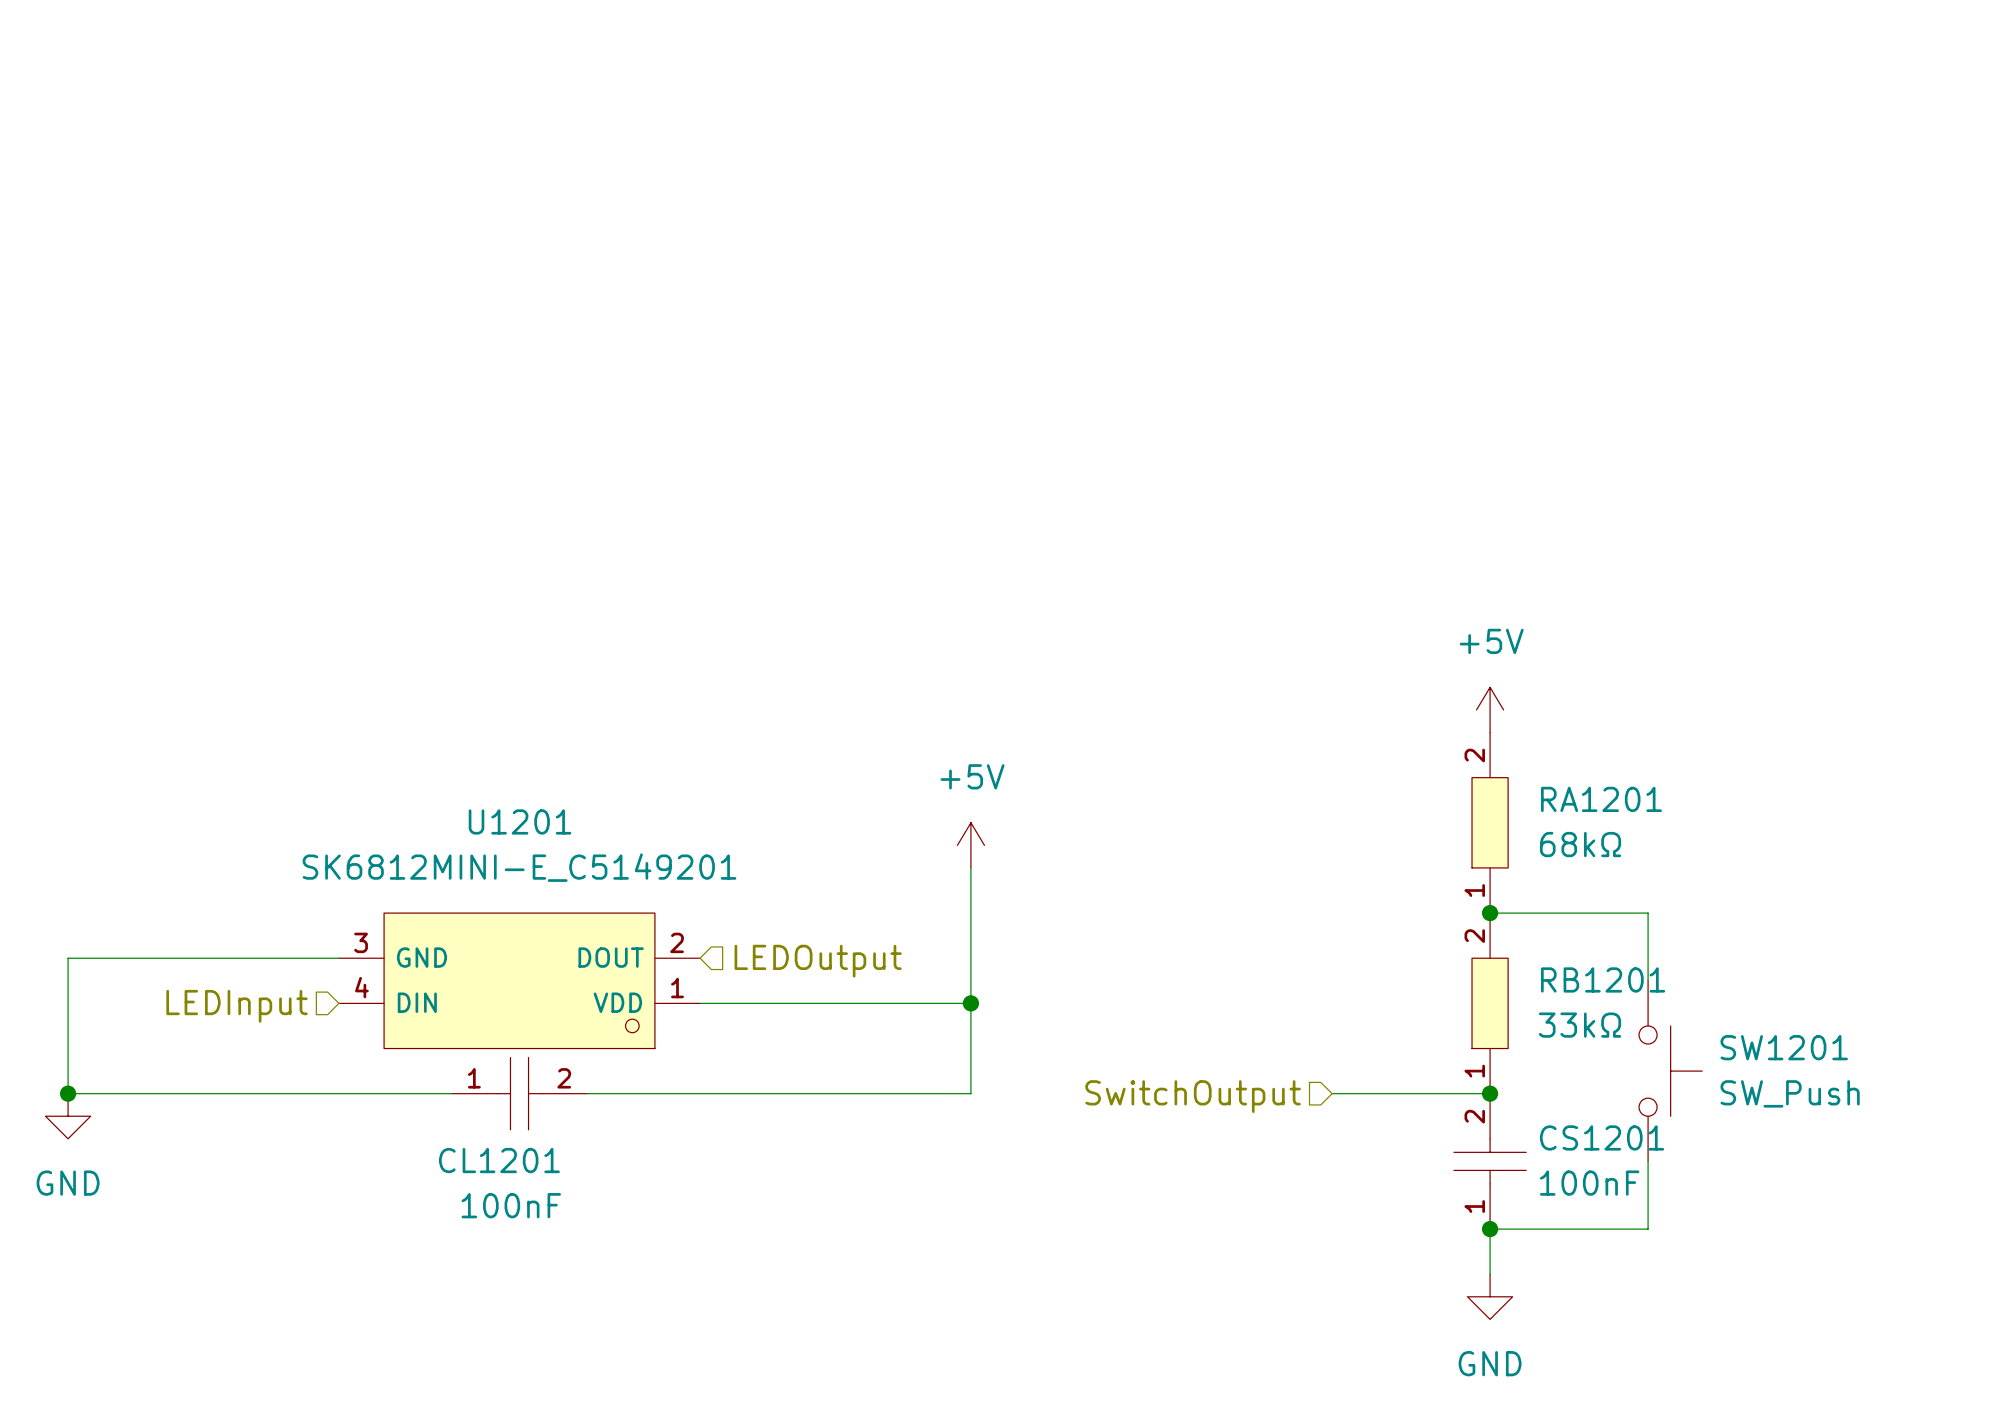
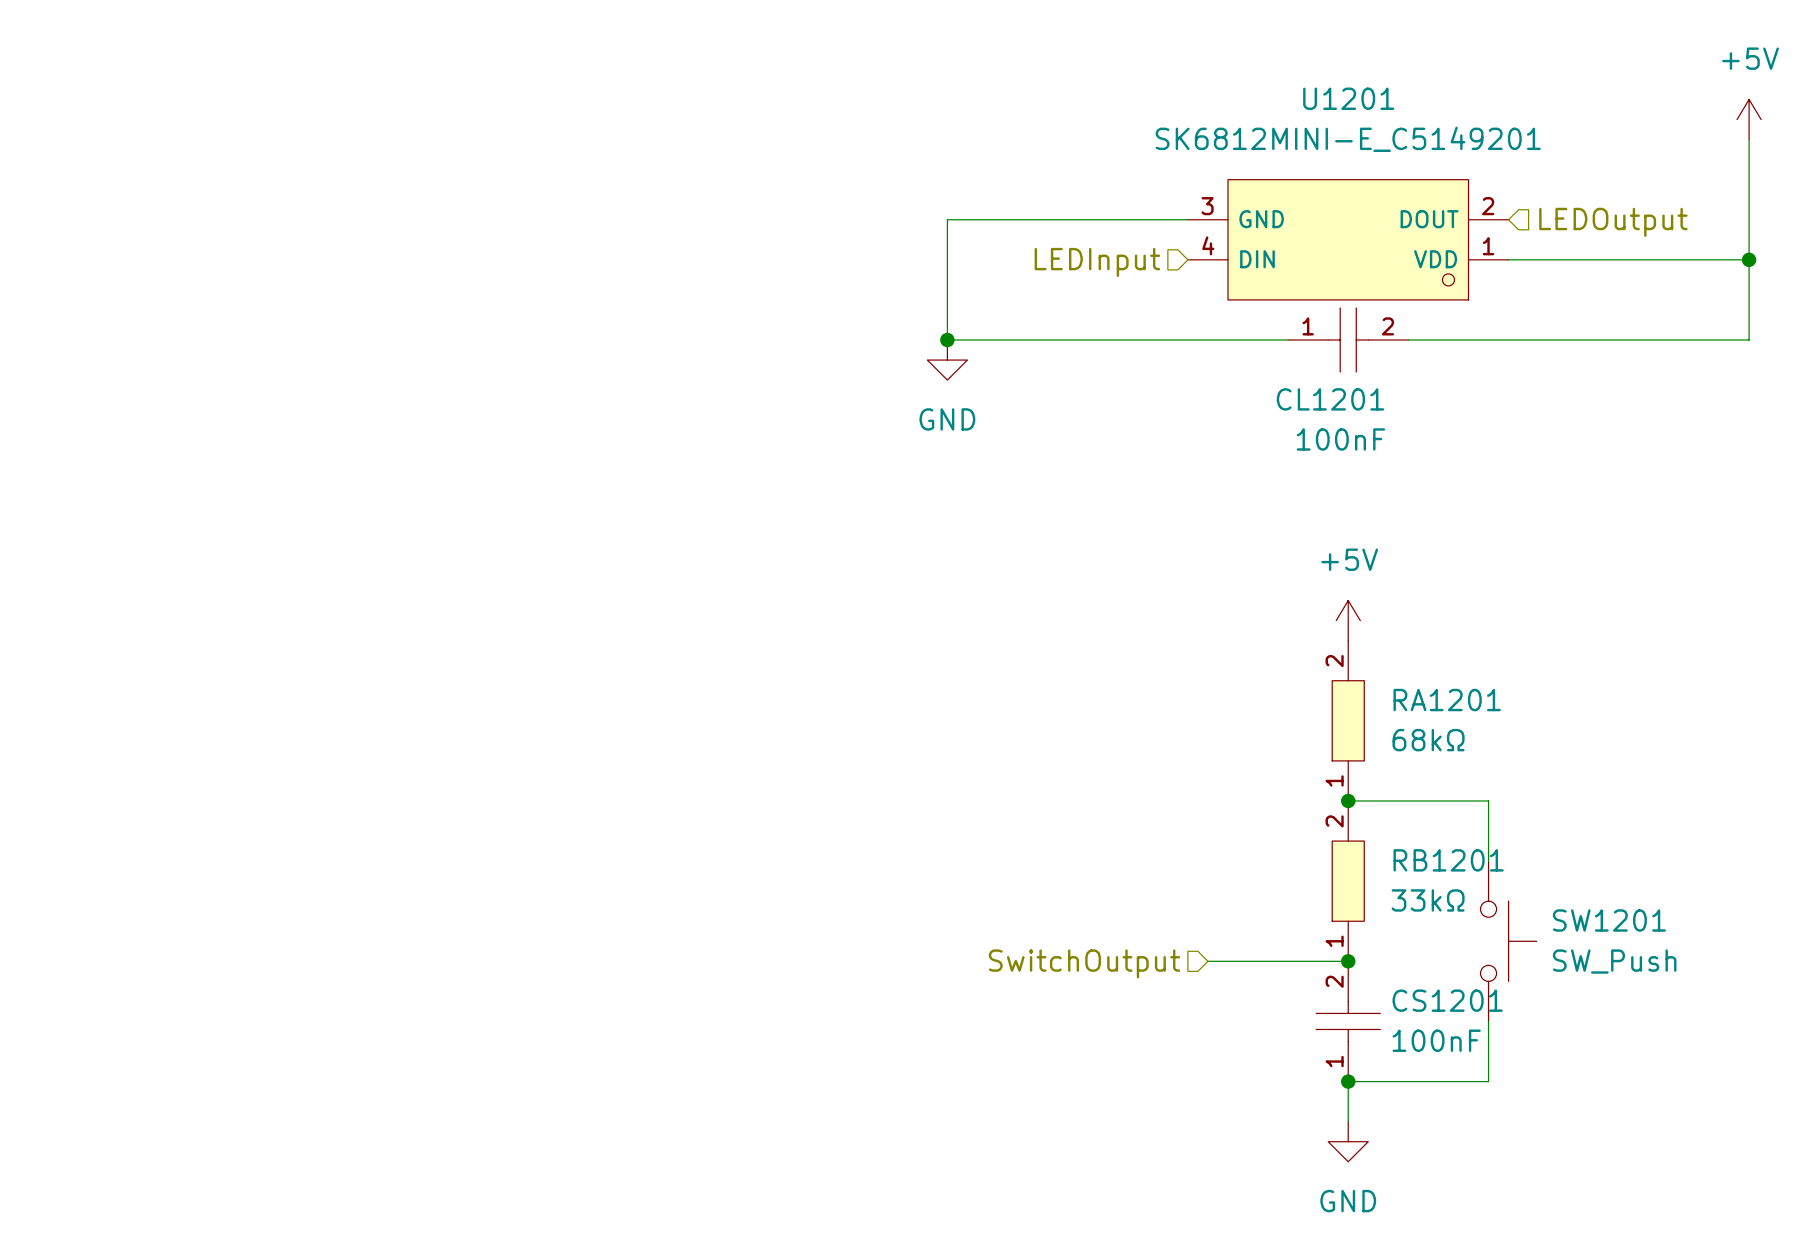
power symbol: none -> +5V (1749, 119)
wire: none -> (1749, 139) (1749, 340) (1408, 340)
wire: none -> (1187, 219) (947, 219) (947, 340) (1288, 340)
hierarchical label: none -> LEDOutput (1613, 222)
wire: none -> (1508, 259) (1749, 259)
junction: none -> (1749, 259)
hierarchical label: none -> LEDInput (1097, 262)
junction: none -> (947, 340)
power symbol: none -> GND (947, 360)
power symbol: +5V (970, 845) -> none
wire: (970, 867) (970, 1093) (587, 1093) -> none
wire: (338, 958) (68, 958) (68, 1093) (451, 1093) -> none
hierarchical label: LEDOutput (818, 961) -> none
U1201 position: (519, 980) -> (1348, 239)
wire: (700, 1003) (970, 1003) -> none
junction: (970, 1003) -> none
hierarchical label: LEDInput (237, 1006) -> none
junction: (68, 1093) -> none
CL1201 position: (519, 1093) -> (1348, 340)
power symbol: GND (68, 1116) -> none

